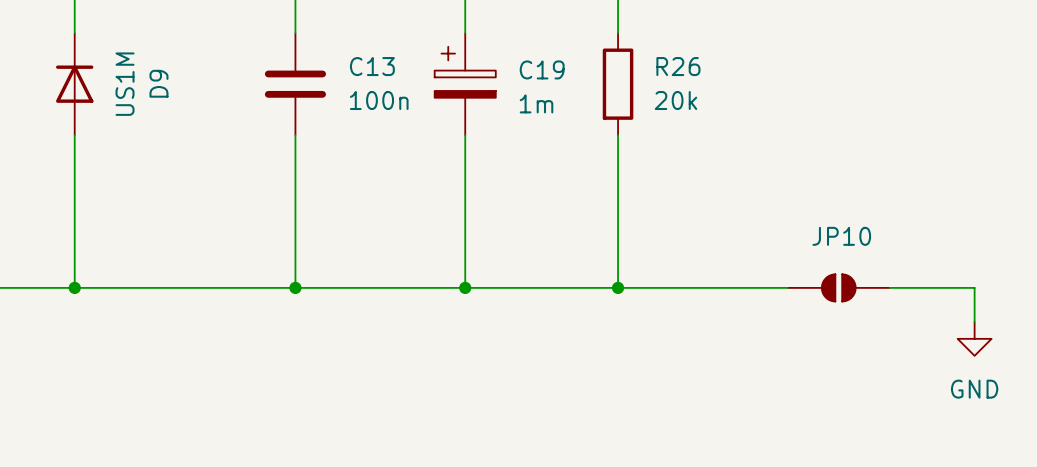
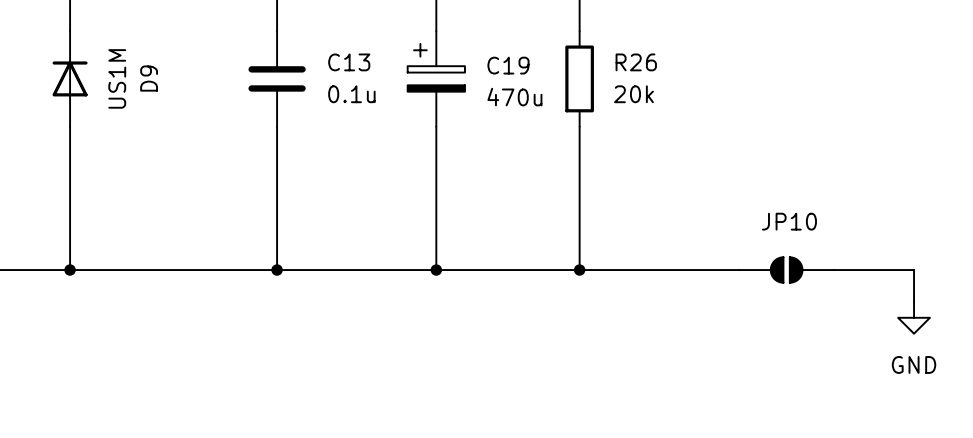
C13 value: 100n (379, 100) -> 0.1u (351, 94)
C19 value: 1m (536, 103) -> 470u (514, 97)

